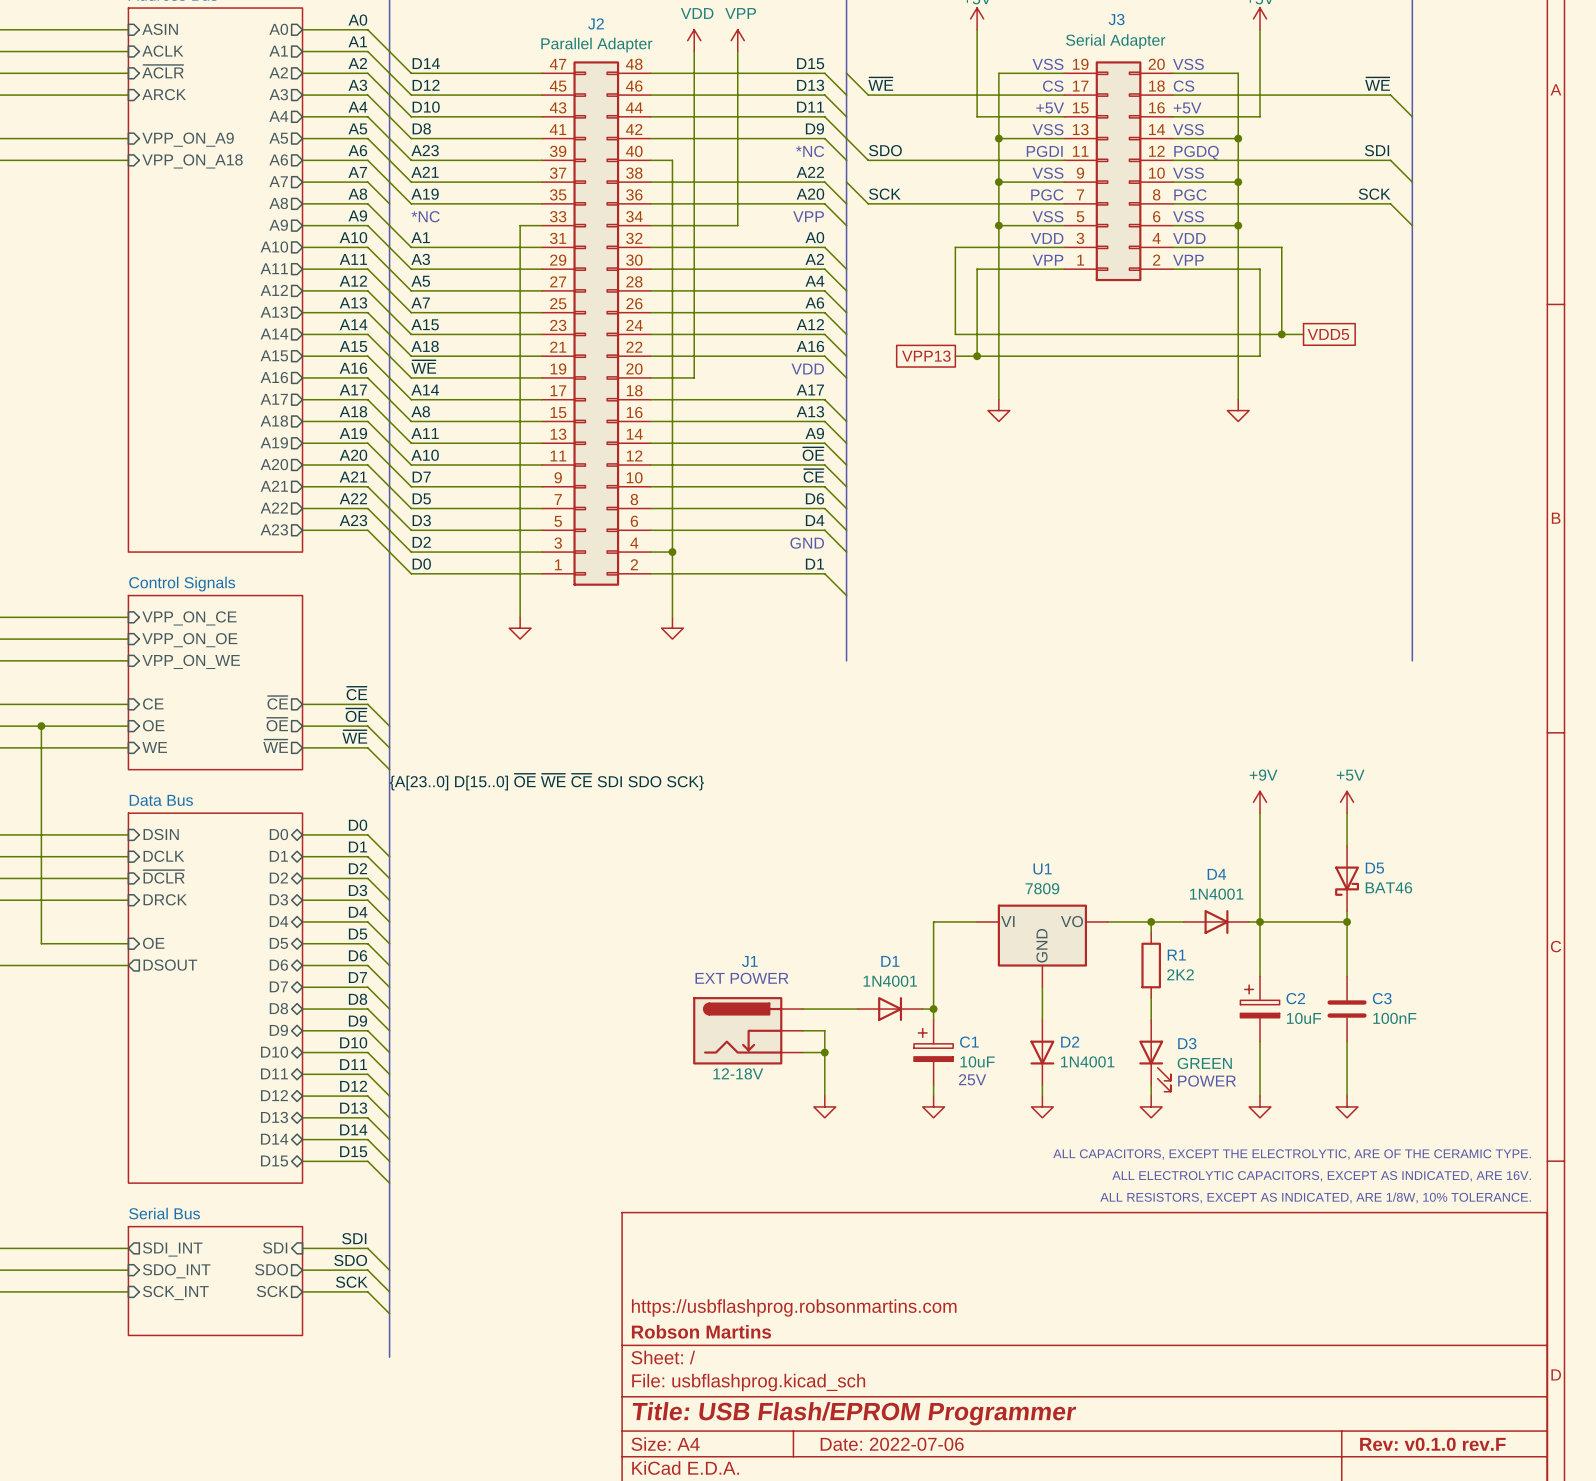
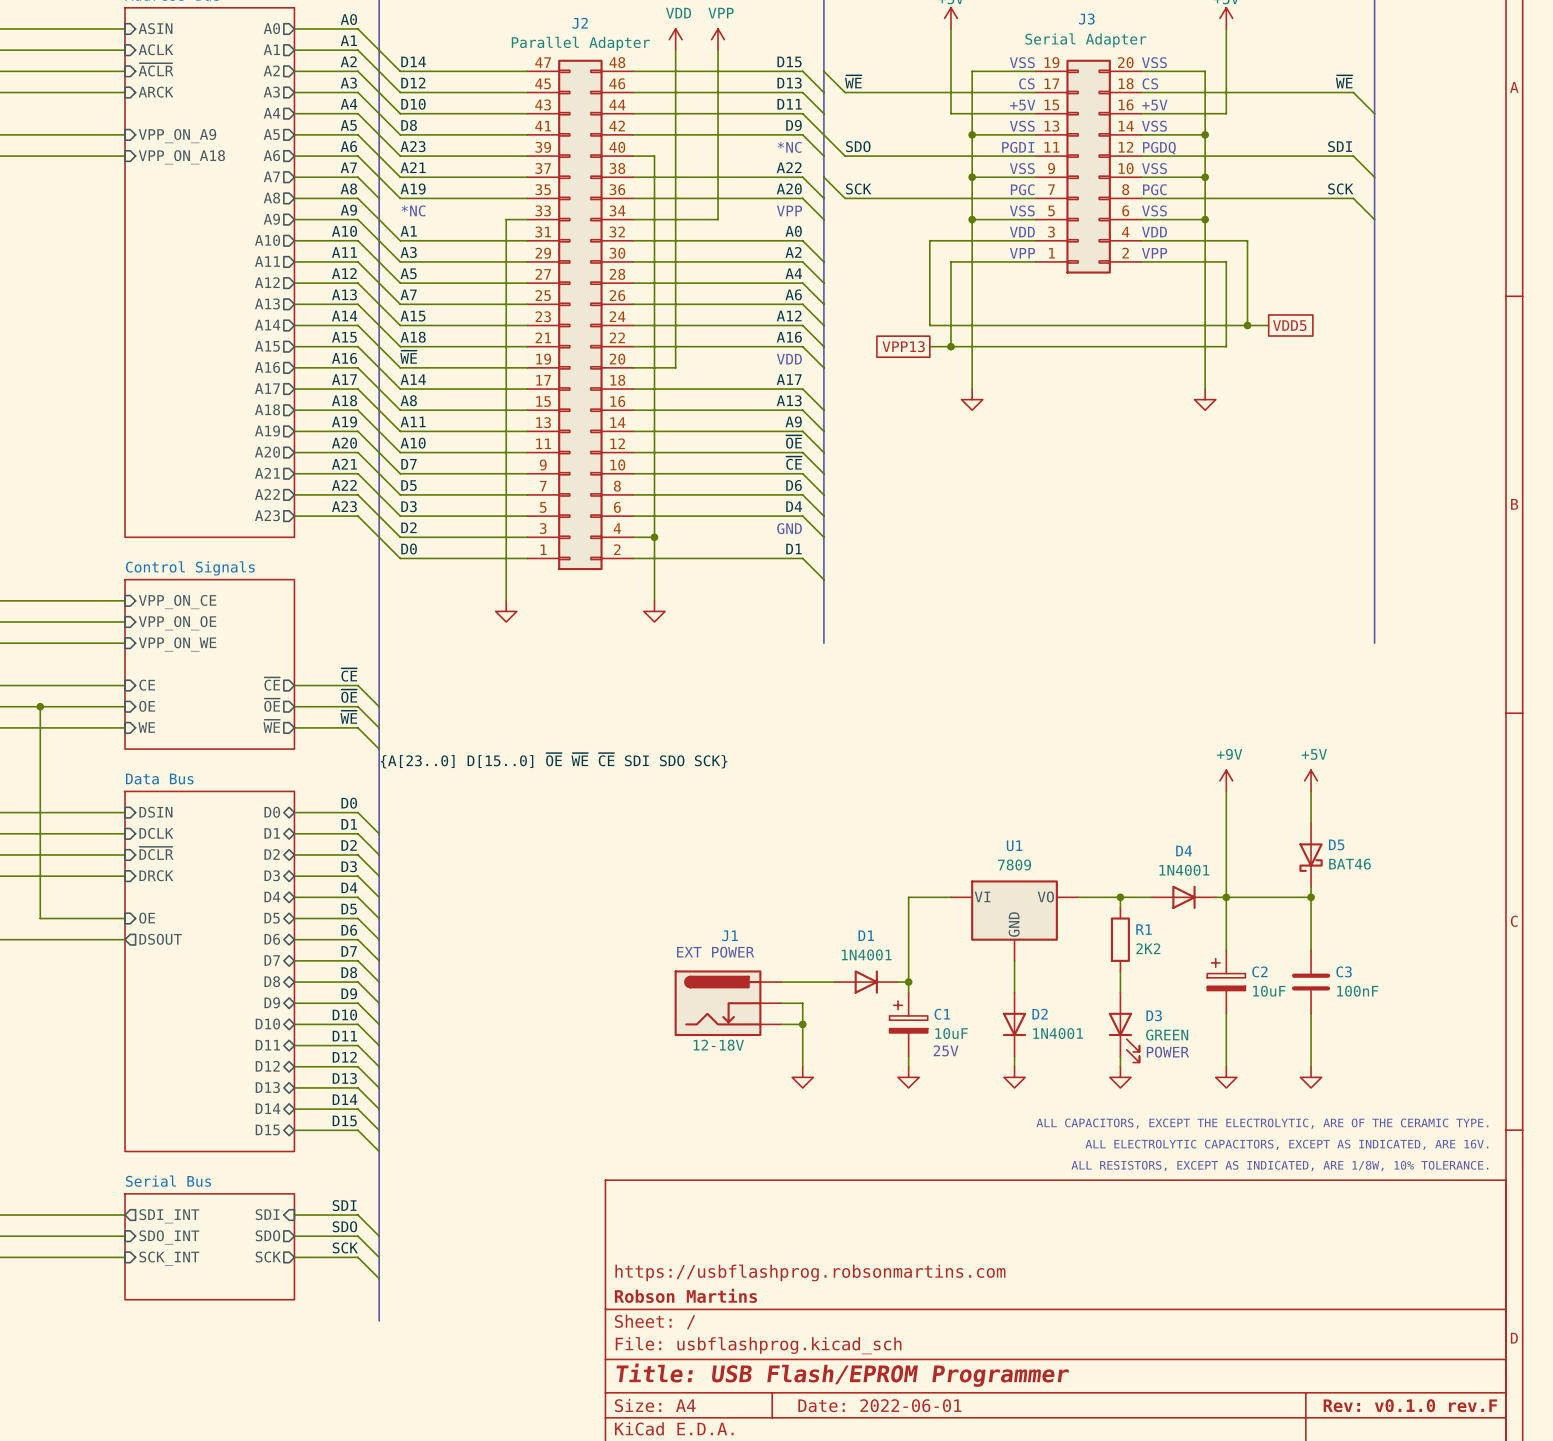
title block: Date: 2022-07-06 (892, 1444) -> Date: 2022-06-01 (879, 1405)

